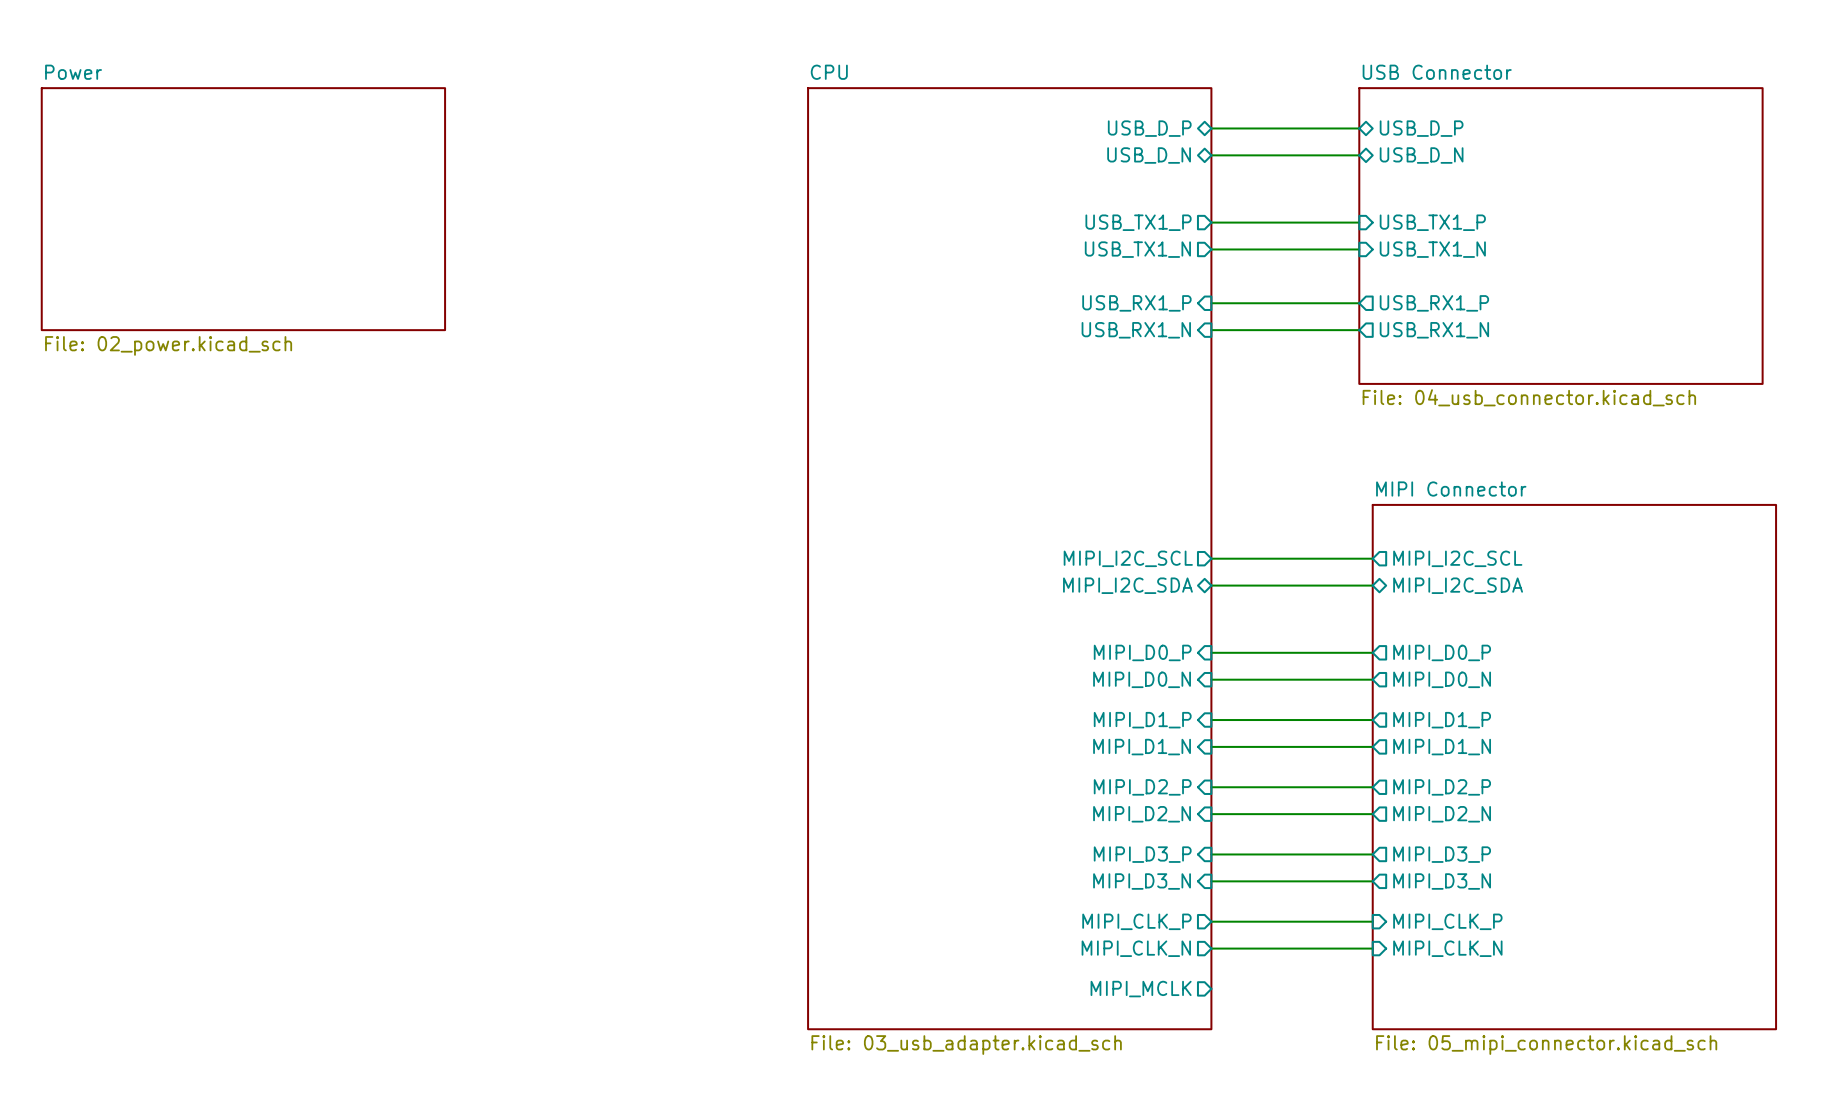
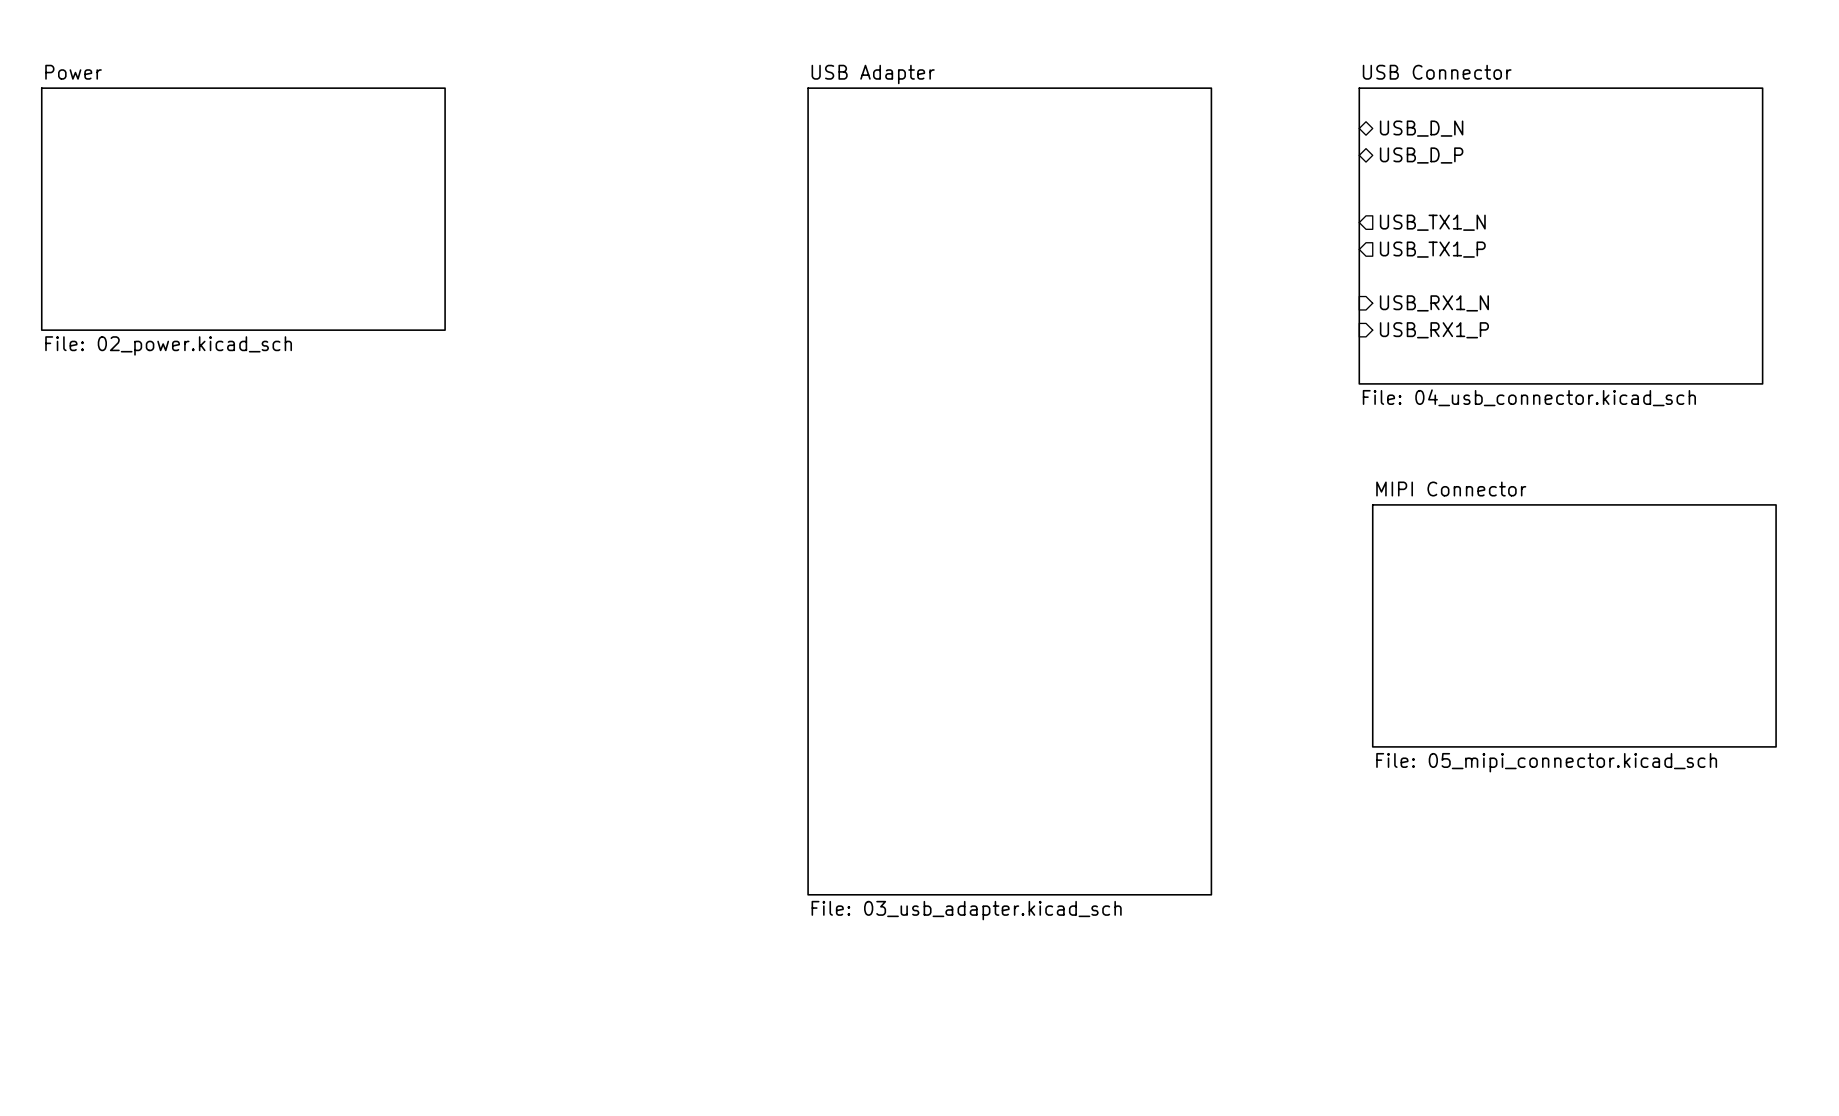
sheet pin: USB_D_P (1149, 128) -> none
wire: (1211, 128) (1359, 128) -> none
sheet pin: USB_D_P (1421, 128) -> USB_D_N (1421, 128)
sheet pin: USB_D_N (1149, 155) -> none
wire: (1211, 155) (1359, 155) -> none
sheet pin: USB_D_N (1421, 155) -> USB_D_P (1421, 155)
sheet pin: USB_TX1_P (1138, 222) -> none
wire: (1211, 222) (1359, 222) -> none
sheet pin shape: input (1432, 222) -> output (1432, 222)
sheet pin: USB_TX1_P (1432, 222) -> USB_TX1_N (1432, 222)
sheet pin: USB_TX1_N (1137, 249) -> none
wire: (1211, 249) (1359, 249) -> none
sheet pin shape: input (1432, 249) -> output (1432, 249)
sheet pin: USB_TX1_N (1432, 249) -> USB_TX1_P (1432, 249)
sheet pin: USB_RX1_P (1136, 303) -> none
wire: (1211, 303) (1359, 303) -> none
sheet pin shape: output (1434, 303) -> input (1434, 303)
sheet pin: USB_RX1_P (1434, 303) -> USB_RX1_N (1434, 303)
sheet pin: USB_RX1_N (1136, 330) -> none
wire: (1211, 330) (1359, 330) -> none
sheet pin shape: output (1434, 330) -> input (1434, 330)
sheet pin: USB_RX1_N (1434, 330) -> USB_RX1_P (1434, 330)
sheet USB Adapter: none -> File: 03_usb_adapter.kicad_sch (1009, 491)
sheet CPU: File: 03_usb_adapter.kicad_sch (1009, 558) -> none
sheet pin: MIPI_I2C_SCL (1128, 558) -> none
wire: (1211, 558) (1372, 558) -> none
sheet pin: MIPI_I2C_SCL (1457, 558) -> none
sheet pin: MIPI_I2C_SDA (1127, 585) -> none
wire: (1211, 585) (1372, 585) -> none
sheet pin: MIPI_I2C_SDA (1458, 585) -> none
sheet MIPI Connector: none -> File: 05_mipi_connector.kicad_sch (1574, 625)
sheet pin: MIPI_D0_P (1142, 652) -> none
wire: (1211, 652) (1372, 652) -> none
sheet pin: MIPI_D0_P (1442, 652) -> none
sheet pin: MIPI_D0_N (1142, 679) -> none
wire: (1211, 679) (1372, 679) -> none
sheet pin: MIPI_D0_N (1442, 679) -> none
sheet pin: MIPI_D1_P (1142, 720) -> none
wire: (1211, 720) (1372, 720) -> none
sheet pin: MIPI_D1_P (1442, 720) -> none
wire: (1211, 746) (1372, 746) -> none
sheet pin: MIPI_D1_N (1142, 747) -> none
sheet pin: MIPI_D1_N (1442, 747) -> none
sheet MIPI Connector: File: 05_mipi_connector.kicad_sch (1574, 767) -> none
sheet pin: MIPI_D2_P (1142, 787) -> none
wire: (1211, 787) (1372, 787) -> none
sheet pin: MIPI_D2_P (1442, 787) -> none
sheet pin: MIPI_D2_N (1142, 814) -> none
wire: (1211, 814) (1372, 814) -> none
sheet pin: MIPI_D2_N (1442, 814) -> none
sheet pin: MIPI_D3_P (1142, 854) -> none
wire: (1211, 854) (1372, 854) -> none
sheet pin: MIPI_D3_P (1442, 854) -> none
sheet pin: MIPI_D3_N (1142, 881) -> none
wire: (1211, 881) (1372, 881) -> none
sheet pin: MIPI_D3_N (1442, 881) -> none
sheet pin: MIPI_CLK_P (1136, 921) -> none
wire: (1211, 921) (1372, 921) -> none
sheet pin: MIPI_CLK_P (1447, 921) -> none
sheet pin: MIPI_CLK_N (1136, 948) -> none
wire: (1211, 948) (1372, 948) -> none
sheet pin: MIPI_CLK_N (1447, 948) -> none
sheet pin: MIPI_MCLK (1141, 989) -> none

